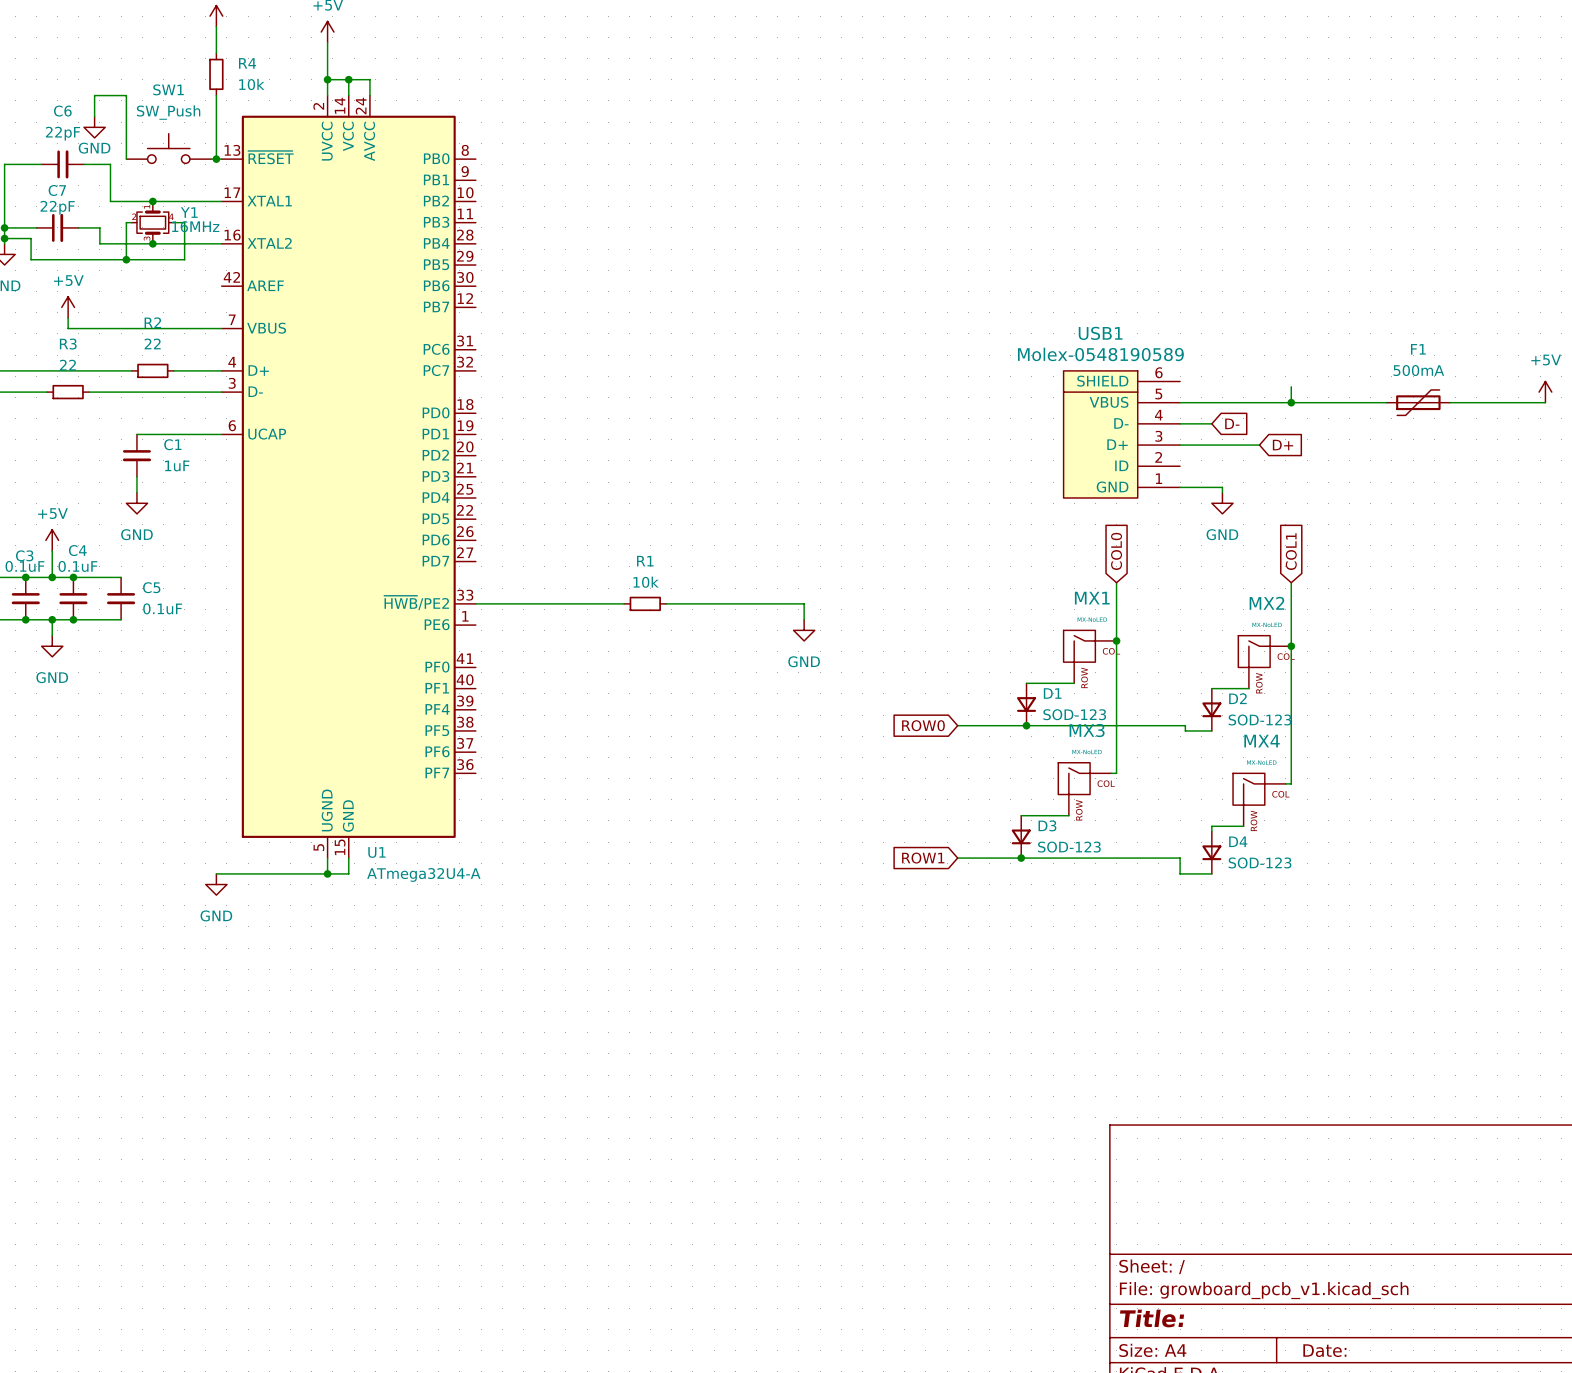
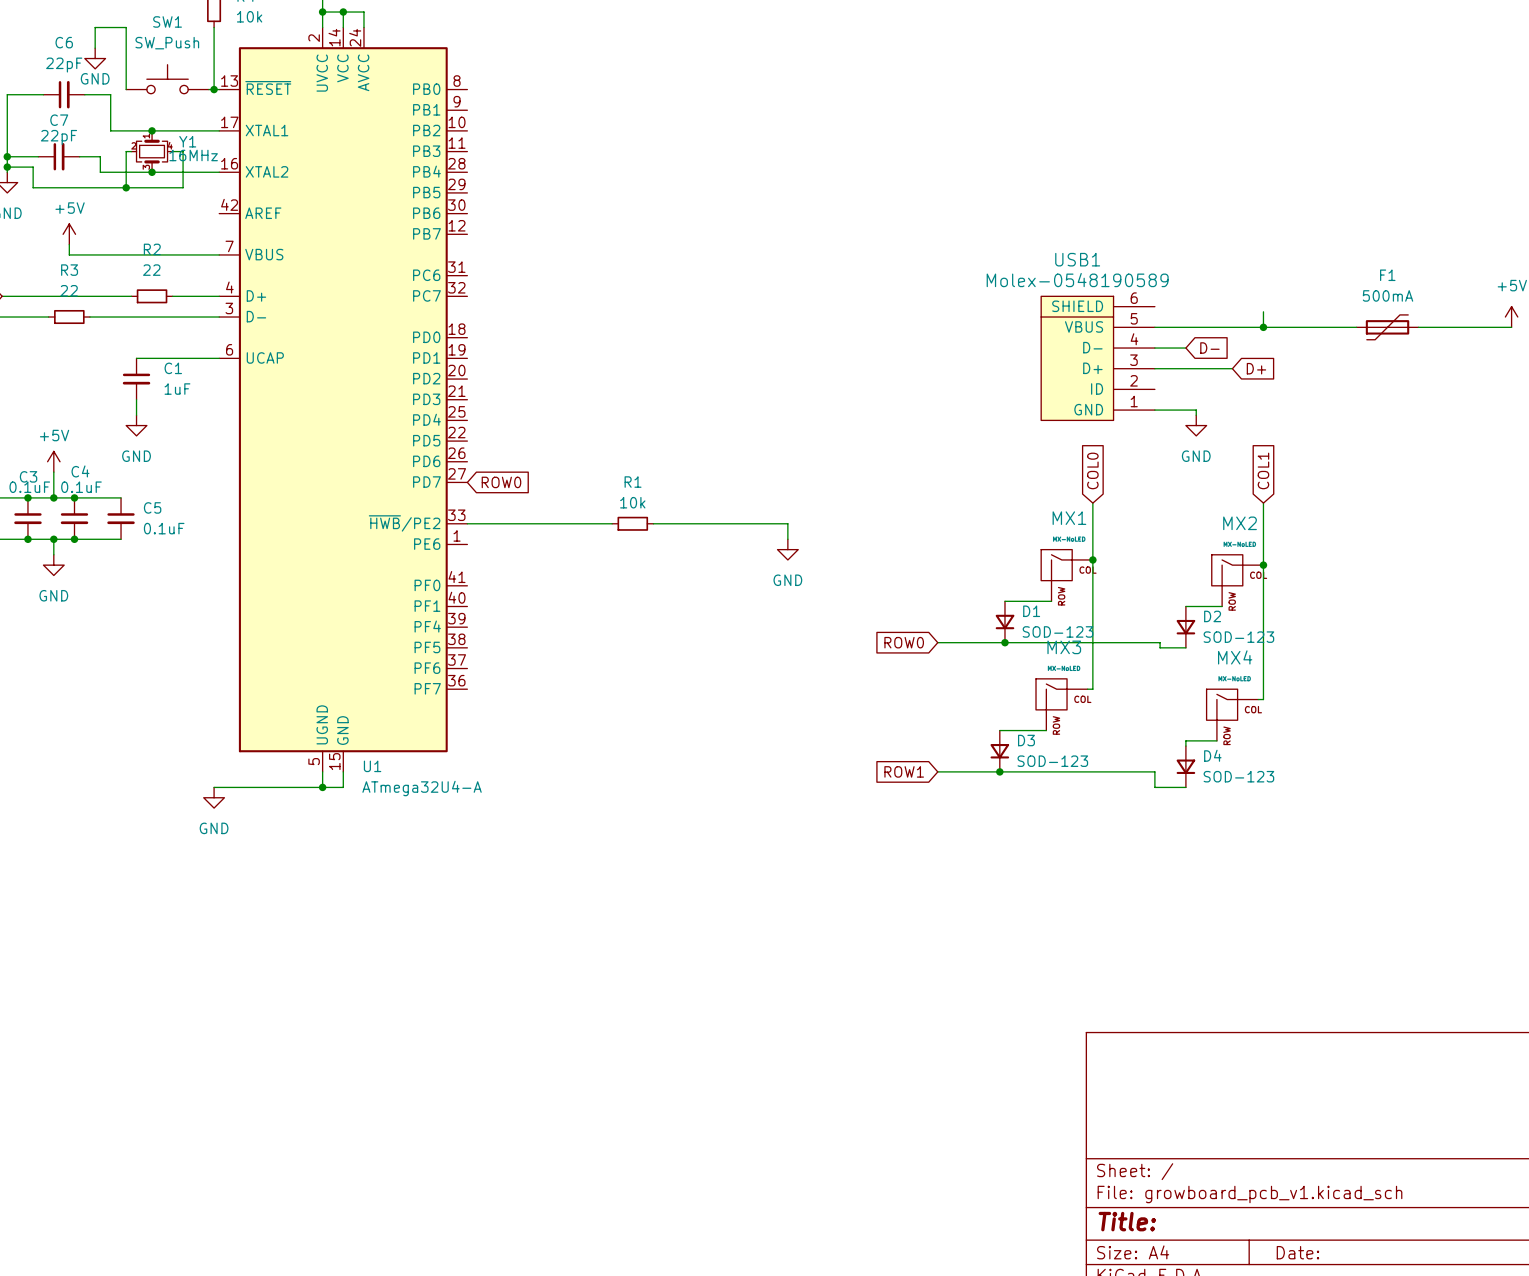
global label: none -> ROW0 (501, 482)

